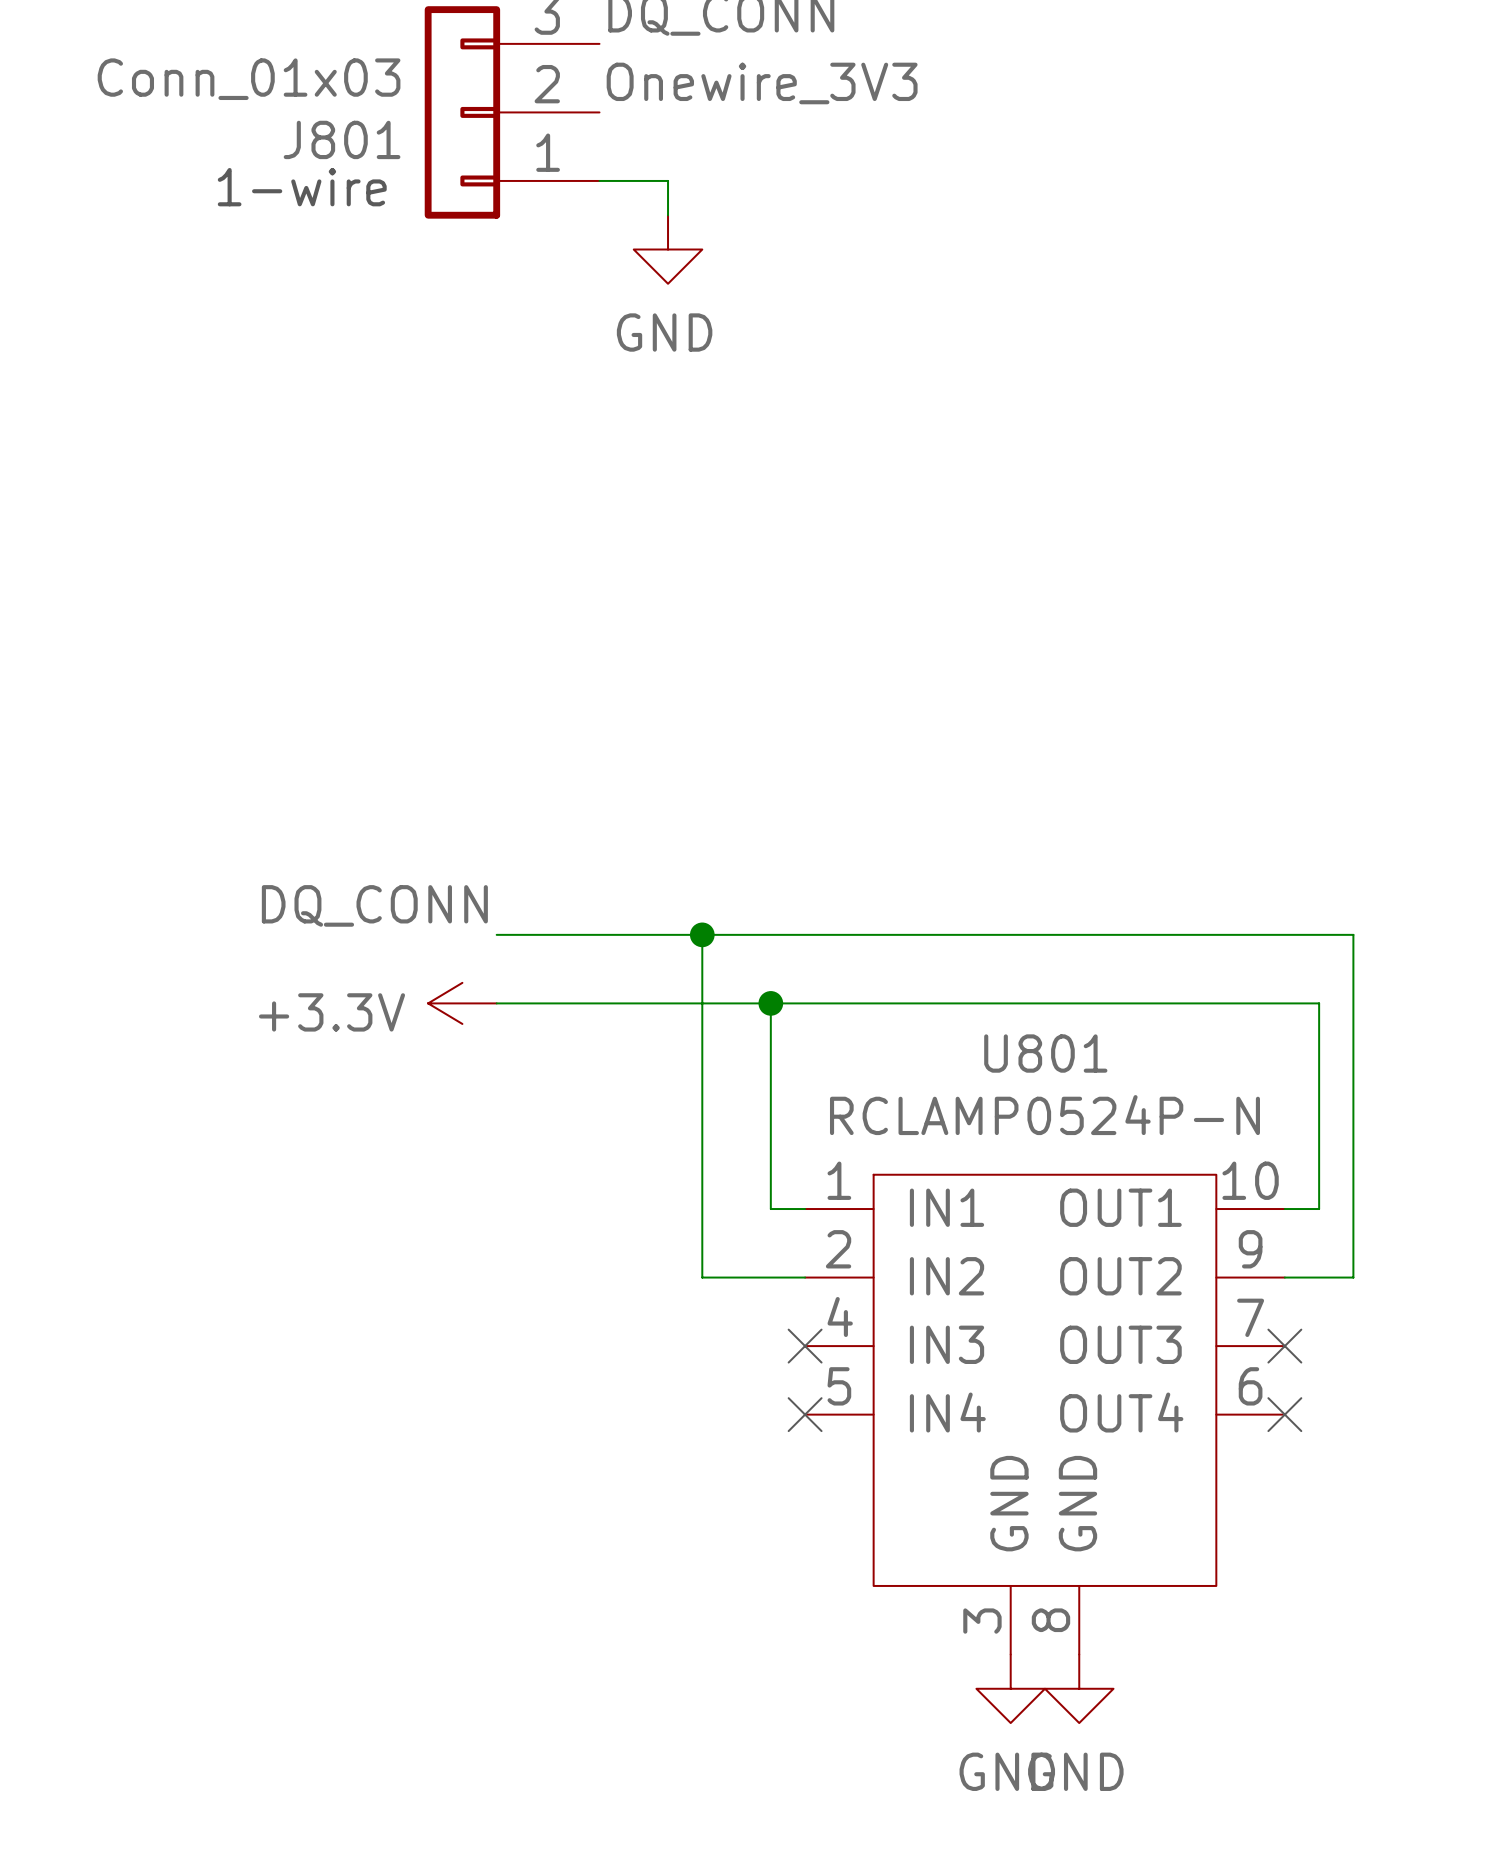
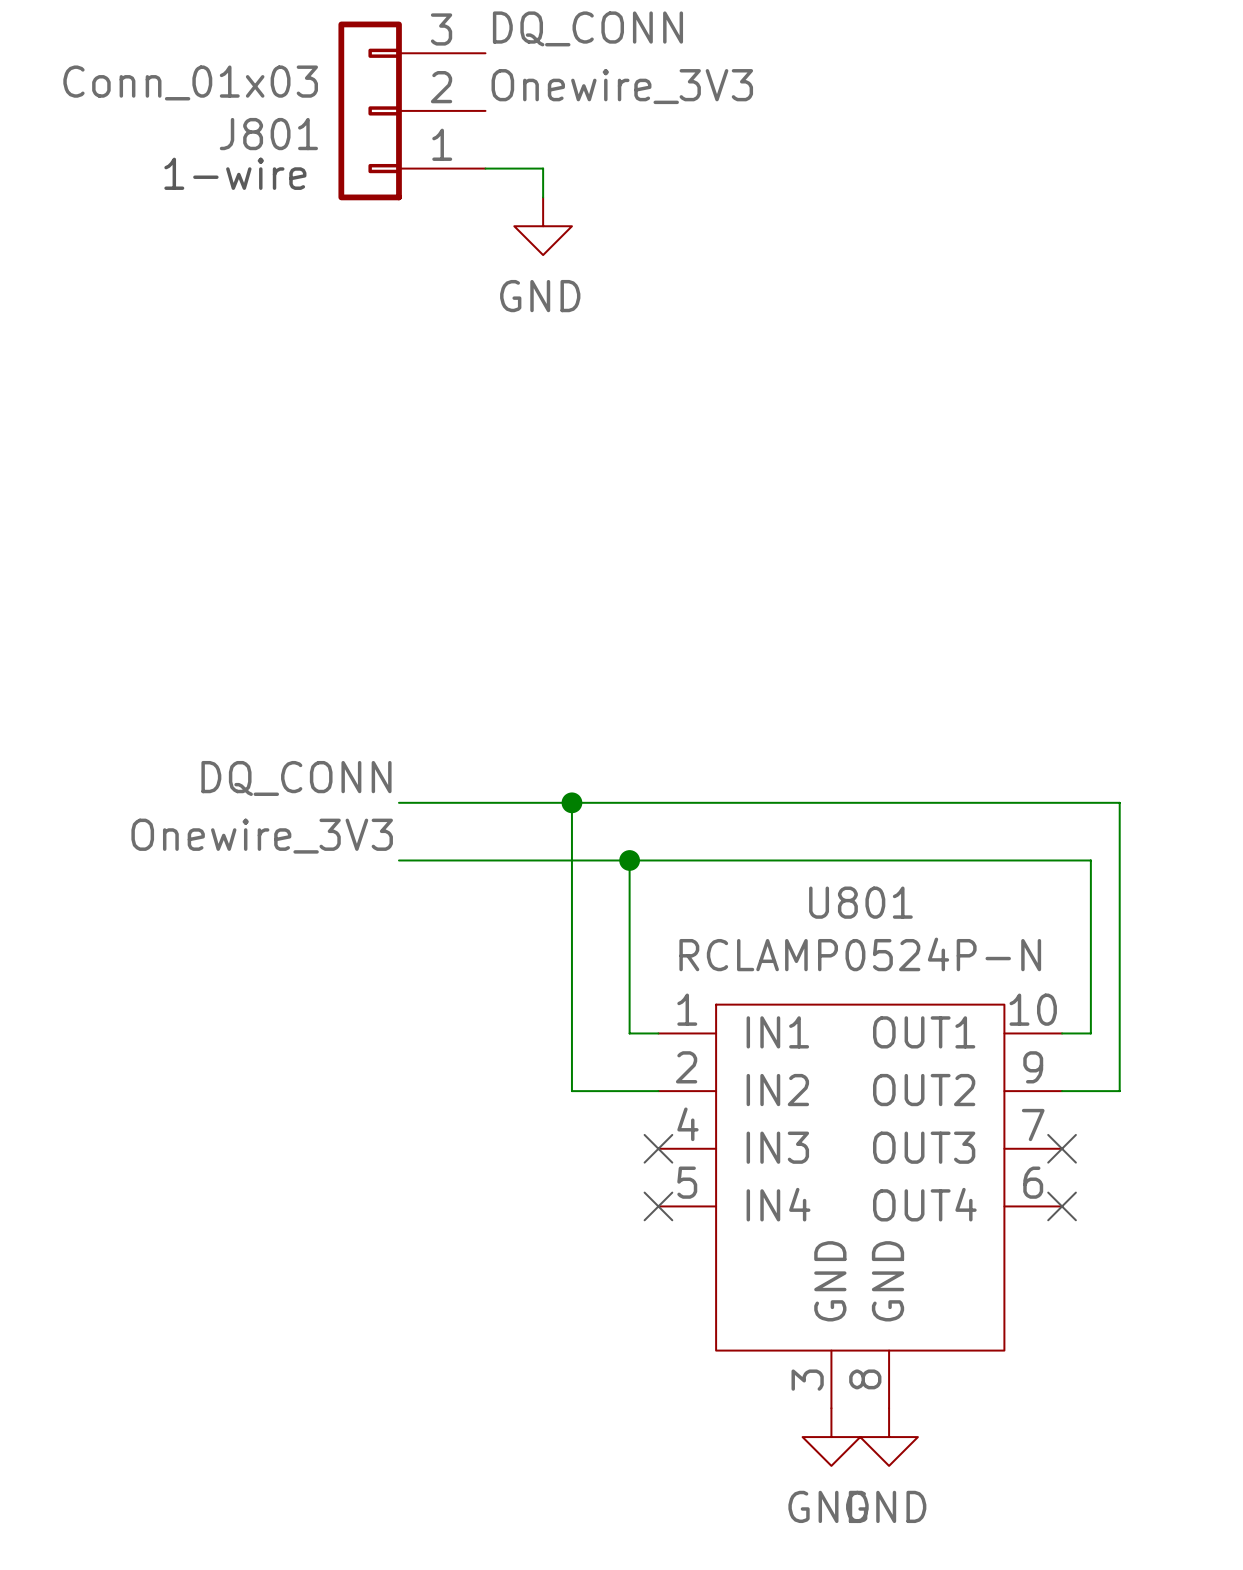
label: none -> Onewire_3V3 (262, 836)
power symbol: +3.3V (462, 1003) -> none

